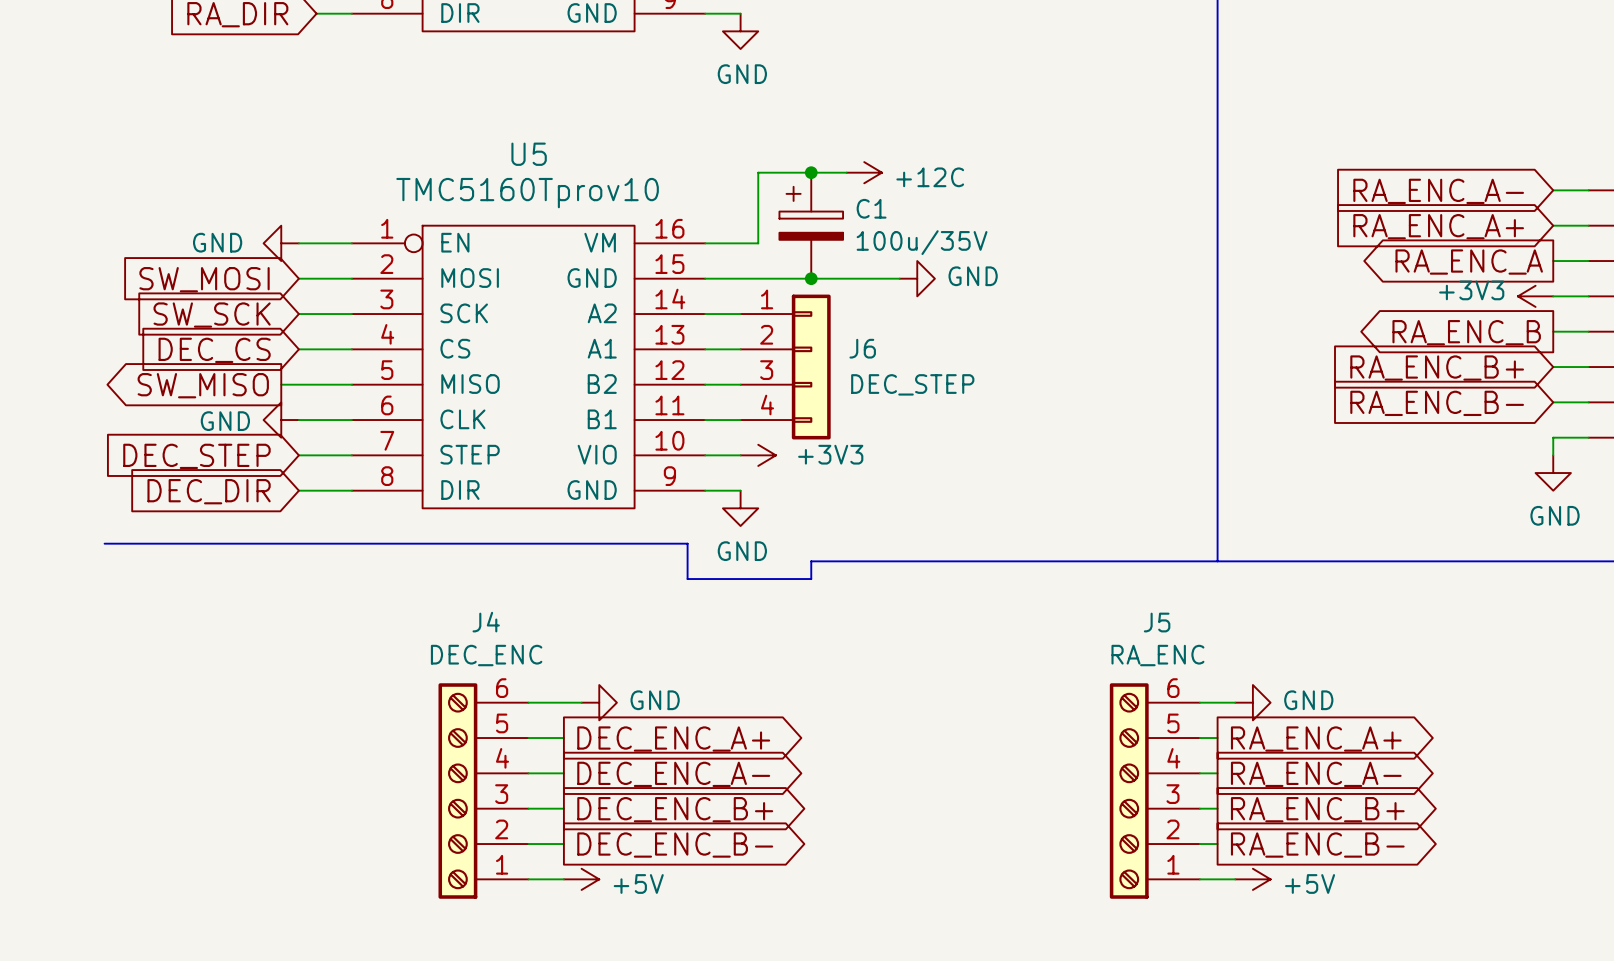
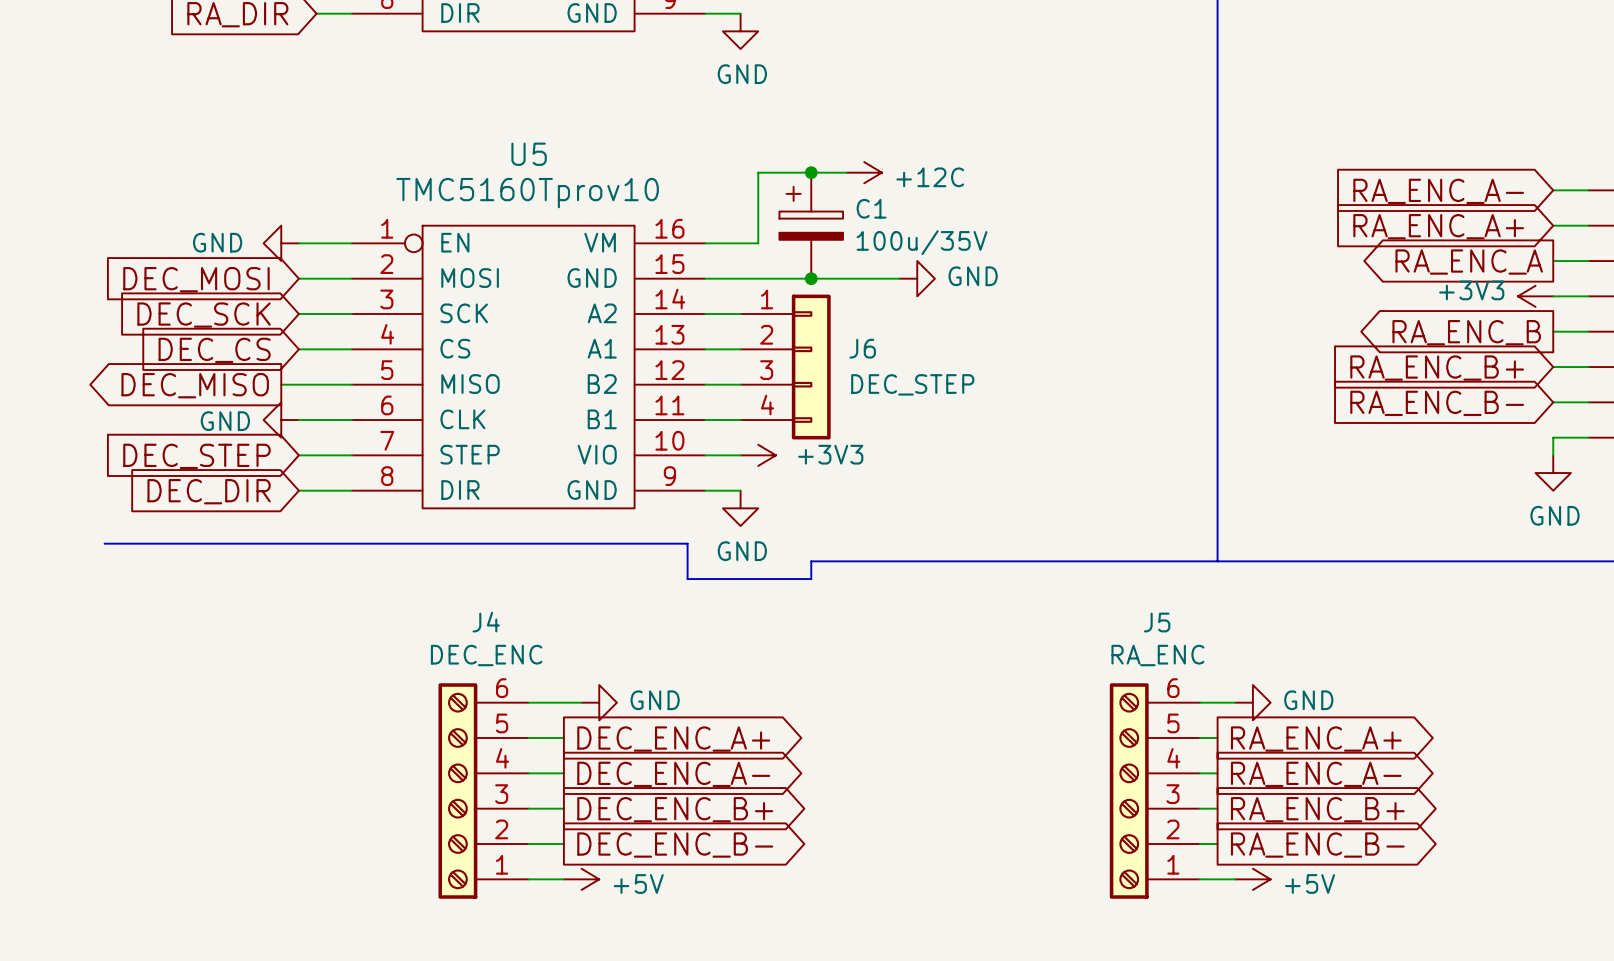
global label: SW_MOSI (204, 279) -> DEC_MOSI (196, 279)
global label: SW_SCK (212, 315) -> DEC_SCK (204, 315)
global label: SW_MISO (203, 385) -> DEC_MISO (195, 385)

